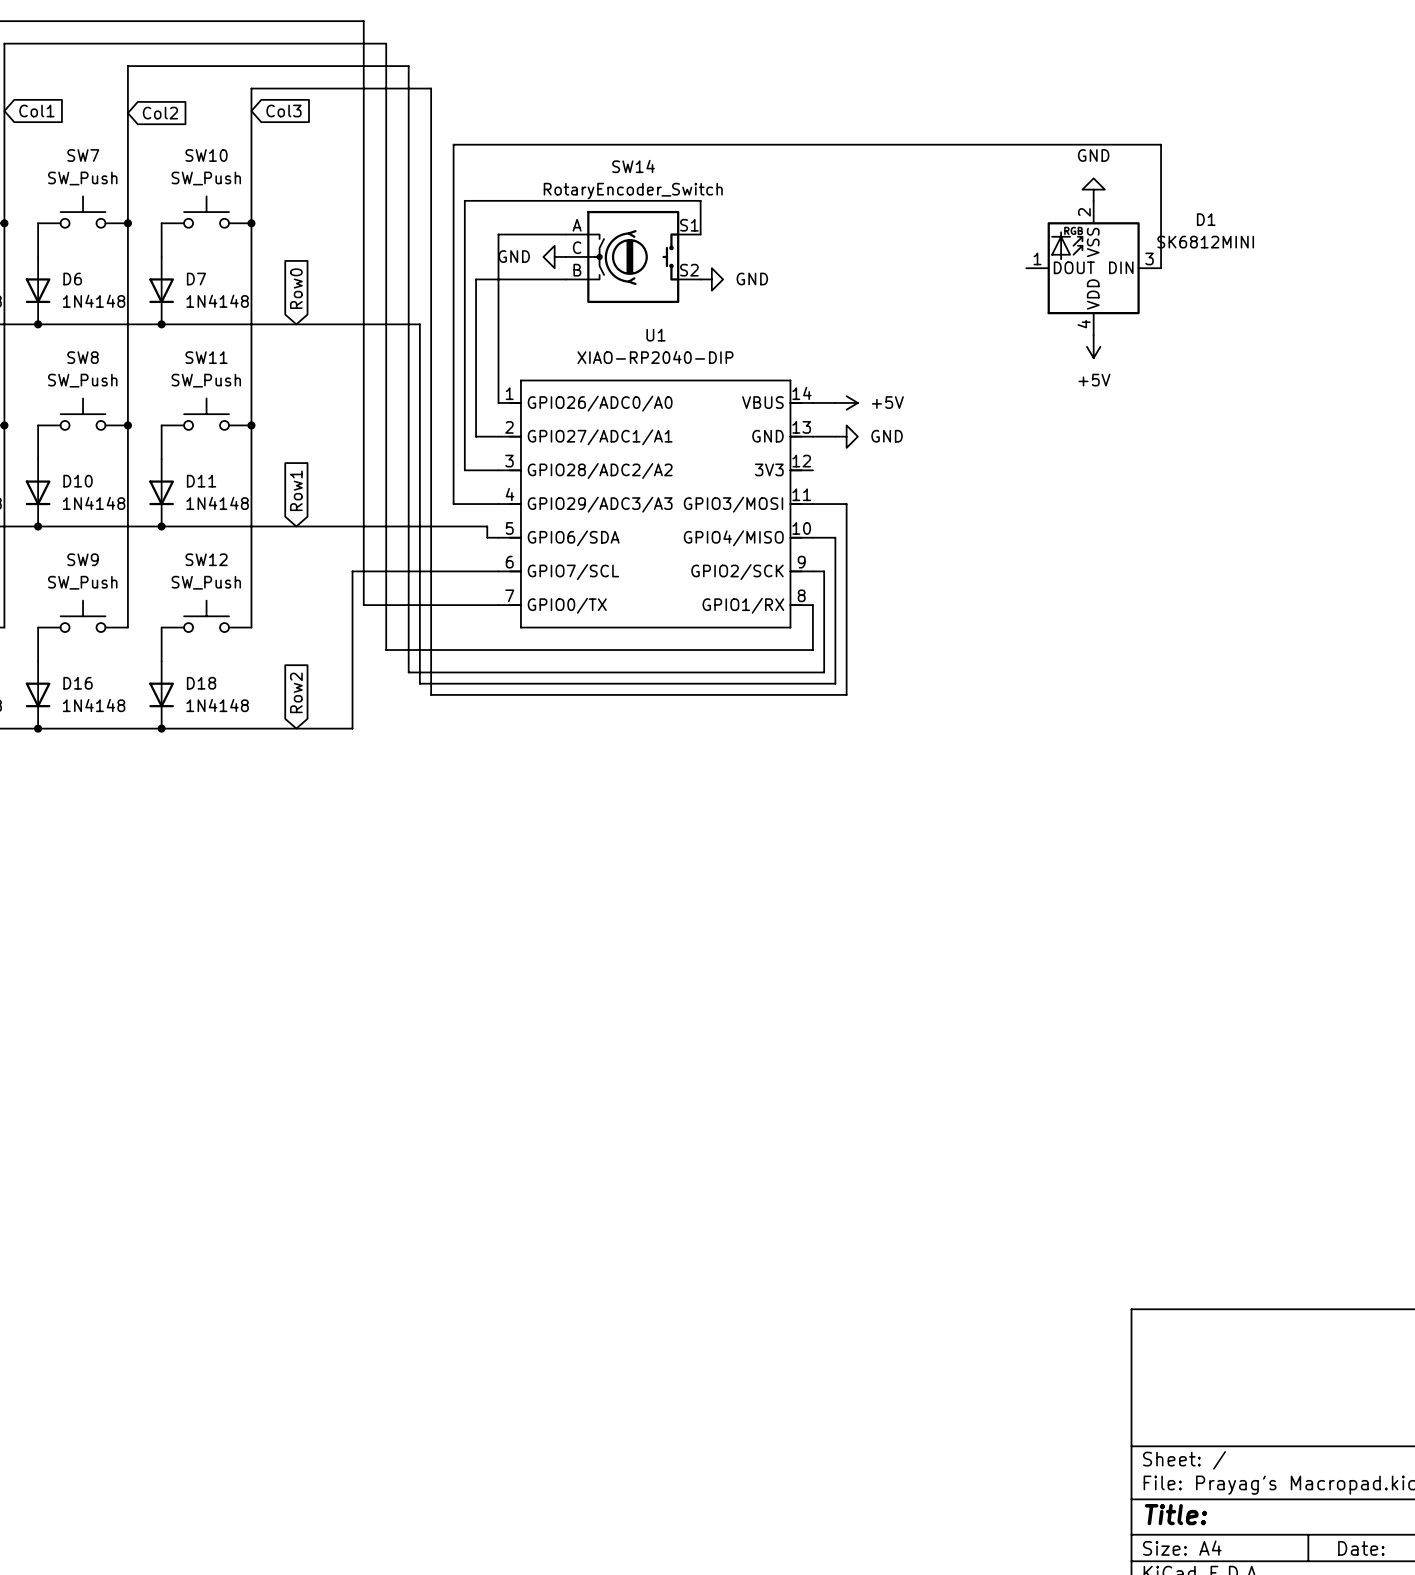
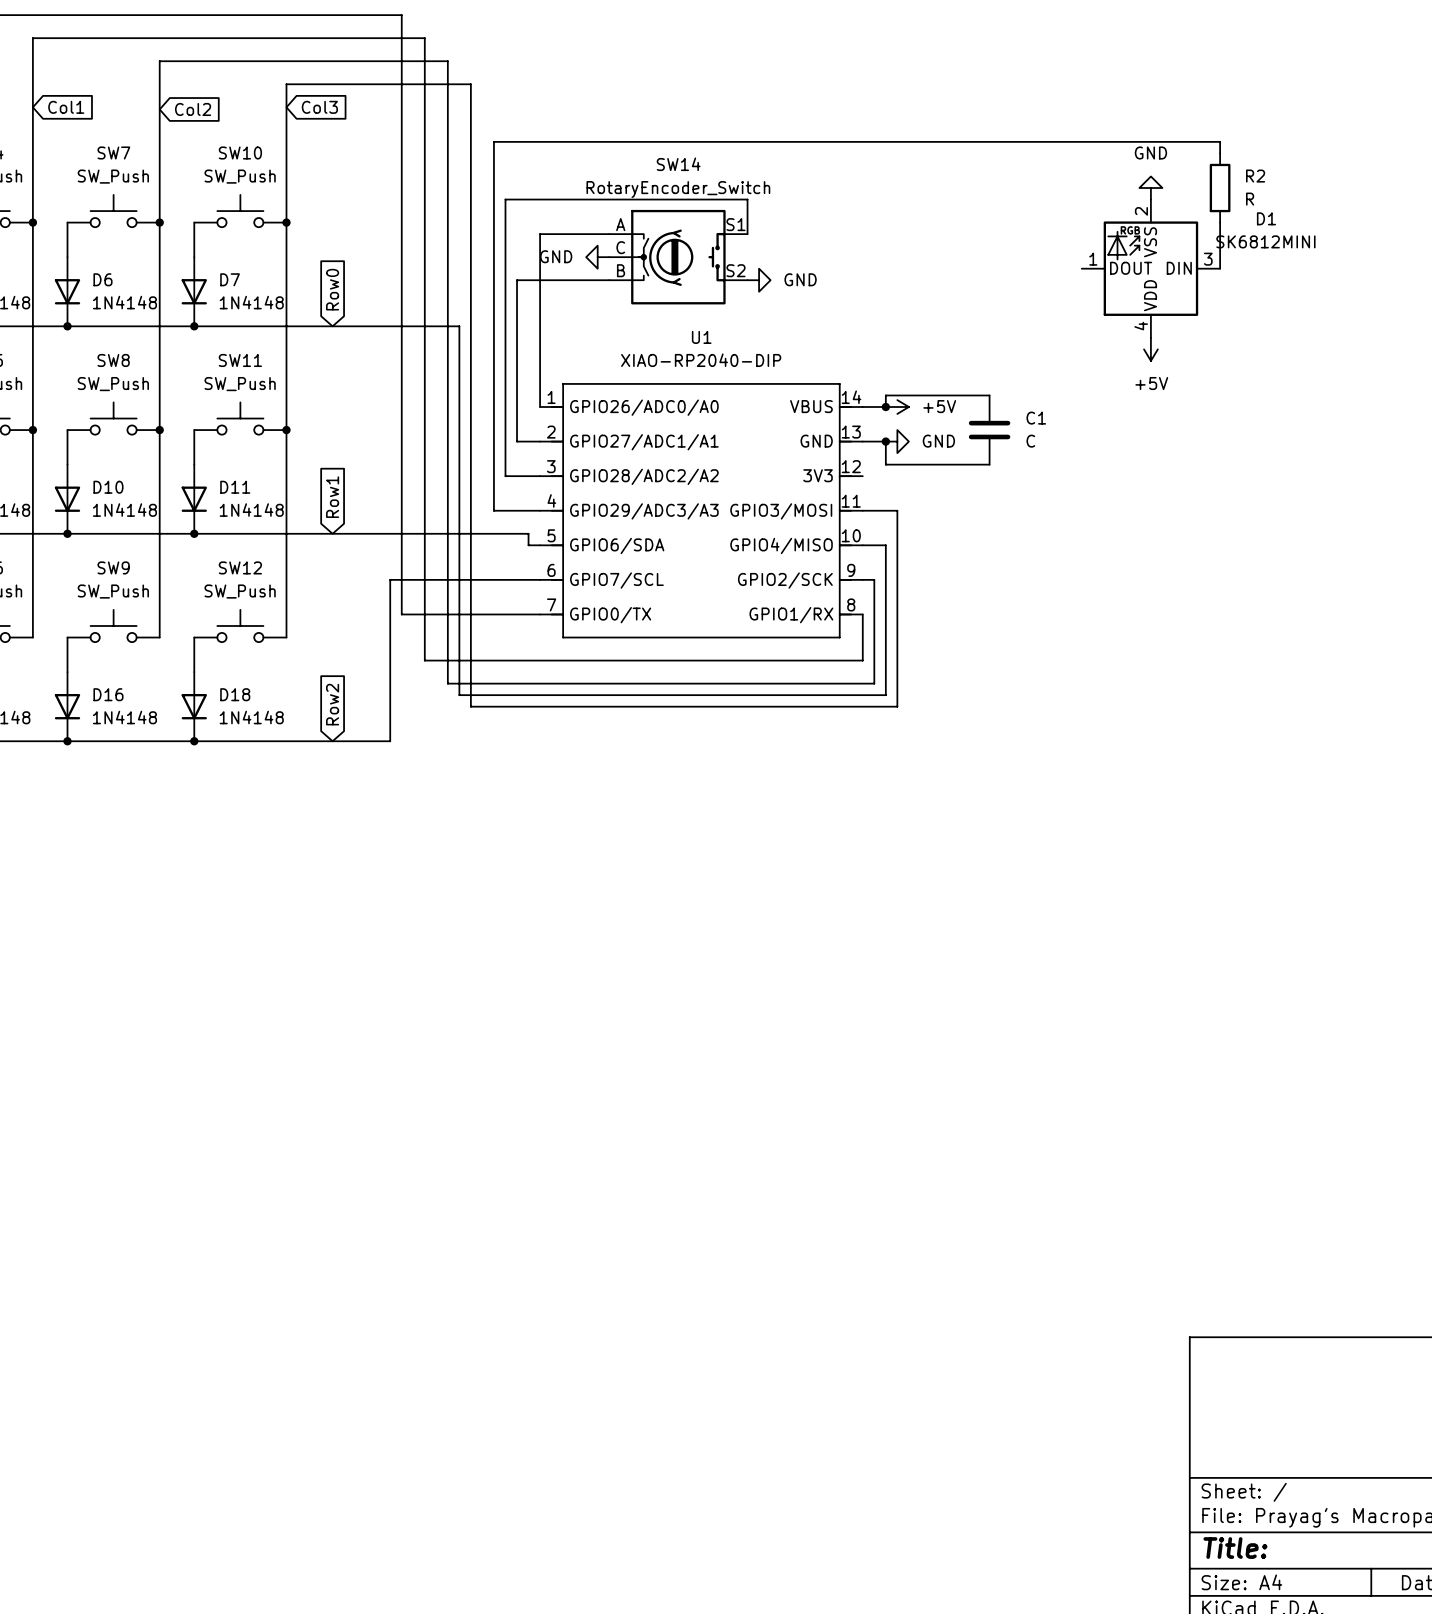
wire: (1161, 155) (1161, 223) -> none
R2: none -> R (1220, 188)
wire: none -> (989, 395) (885, 395) (885, 407)
junction: none -> (885, 407)
C1: none -> C (989, 430)
wire: none -> (885, 441) (885, 464) (989, 464)
junction: none -> (885, 441)

